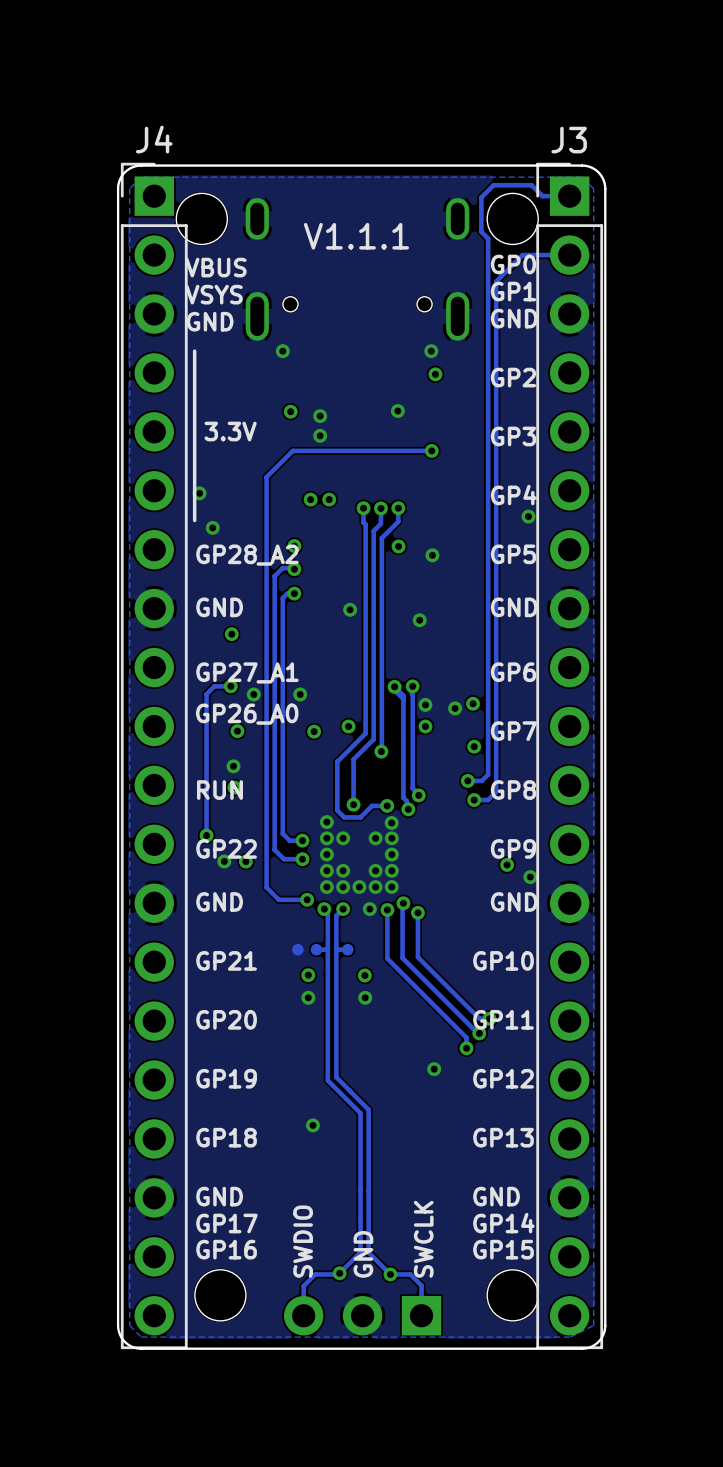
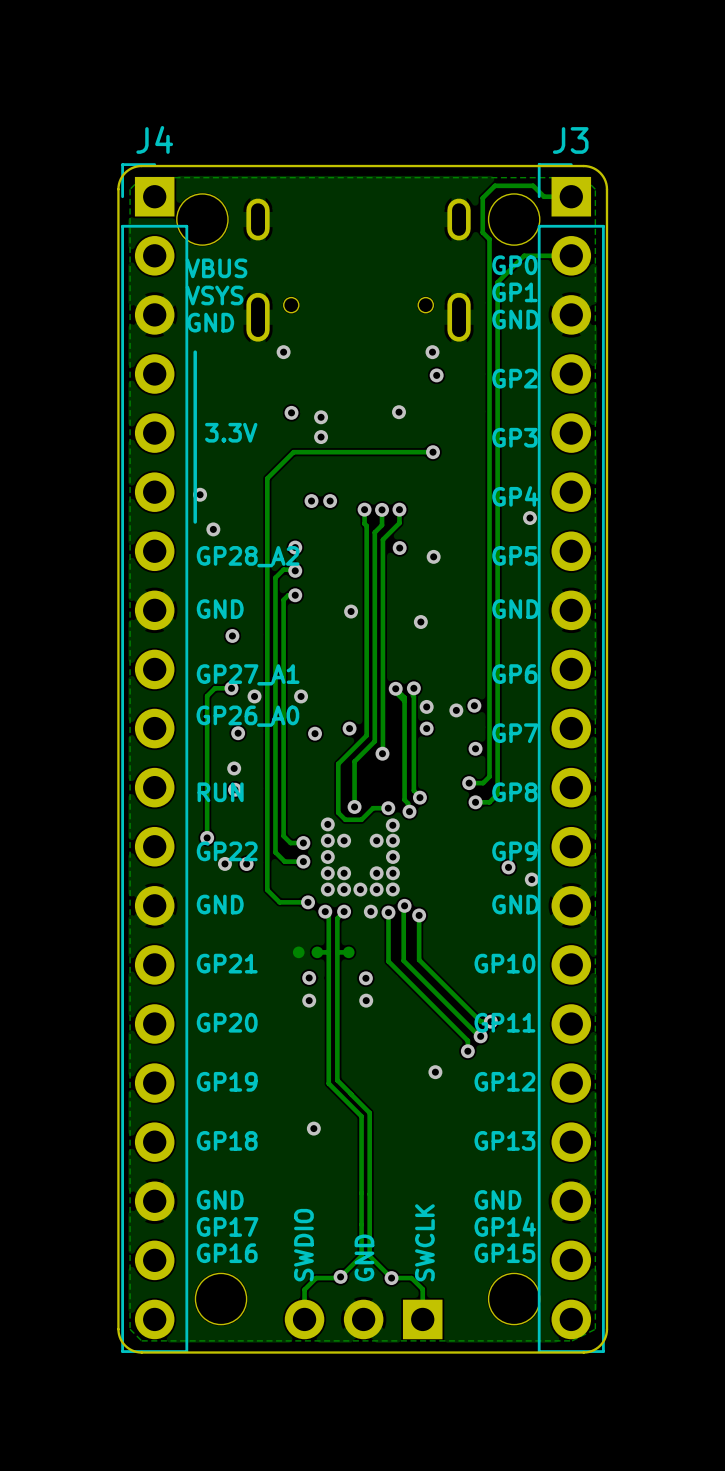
text: V1.1.1 (356, 236) -> none

